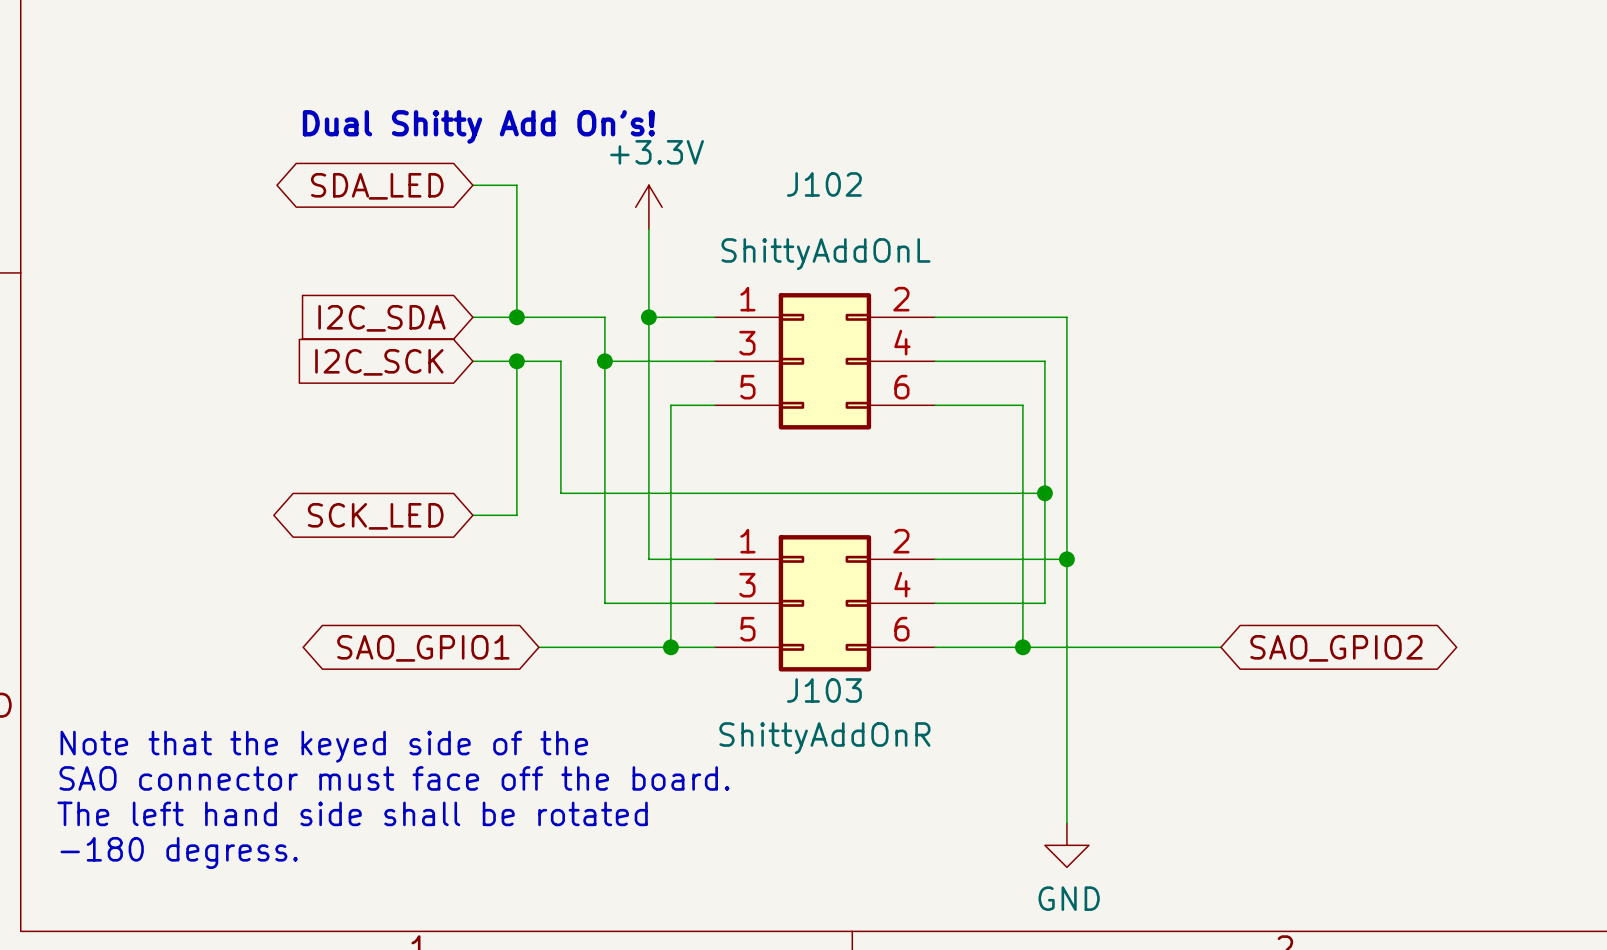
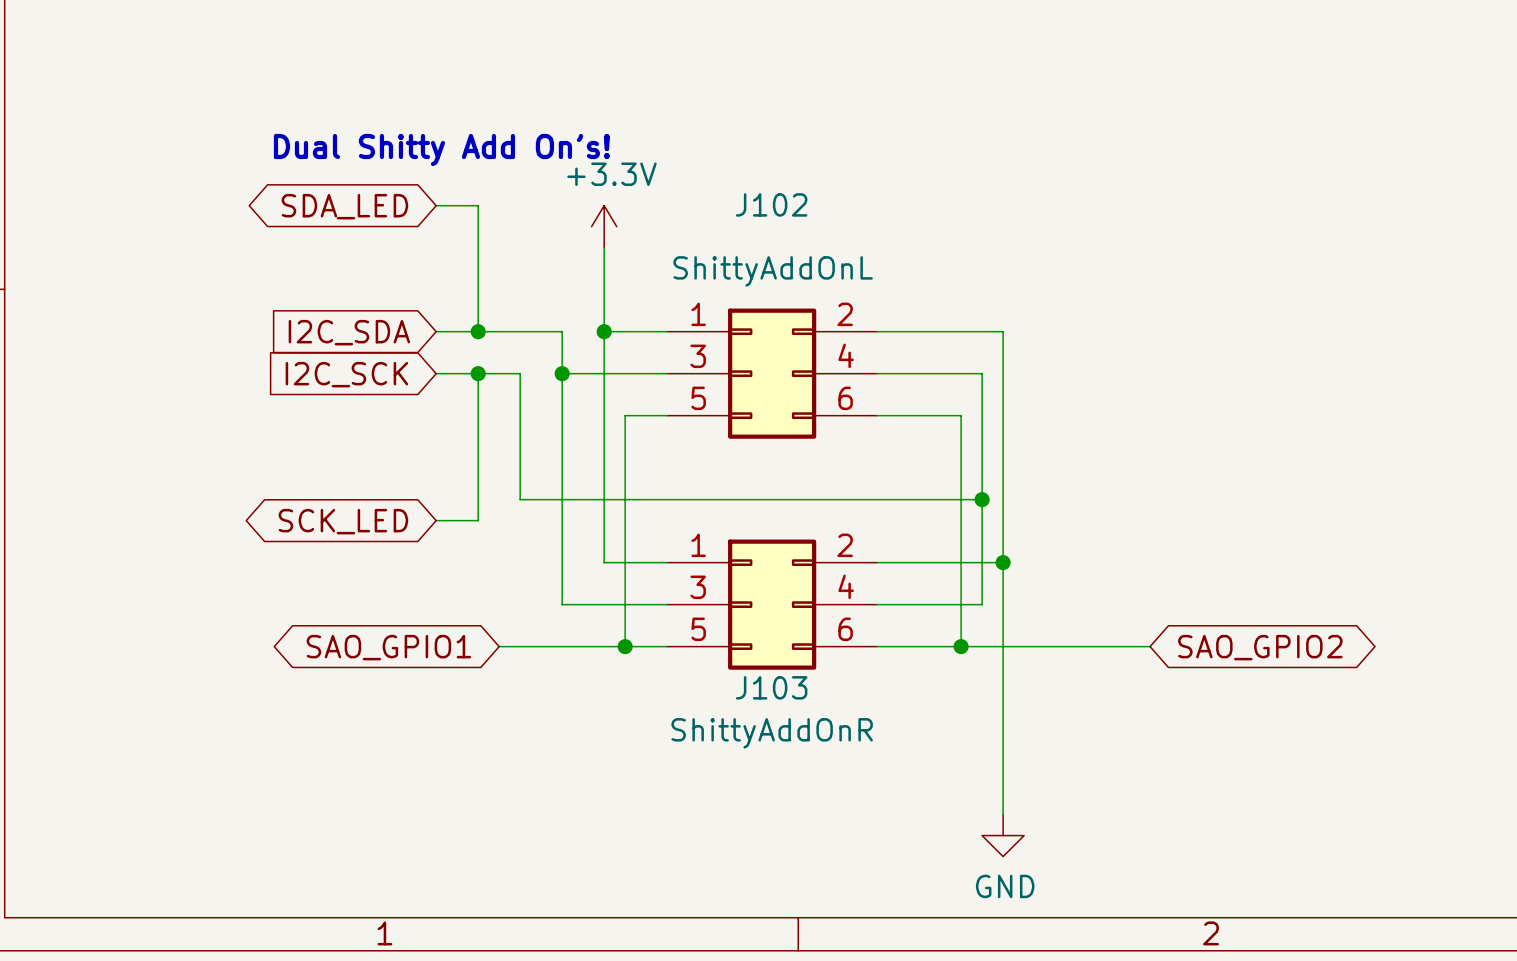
text: Note that the keyed side of the (324, 746) -> none
text: SAO connector must face off the board. (394, 778) -> none
text: The left hand side shall be rotated (352, 813) -> none
text: -180 degress. (179, 852) -> none

